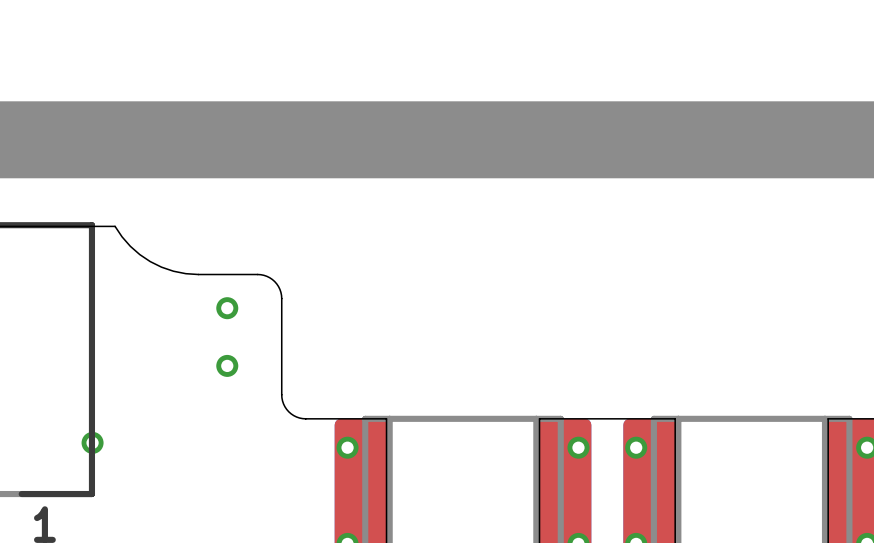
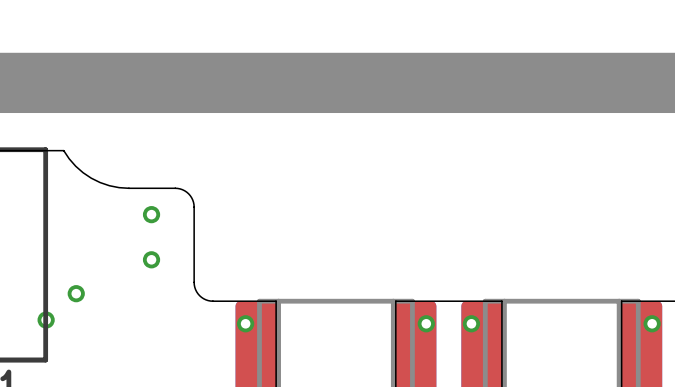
via: none -> (76, 293)

